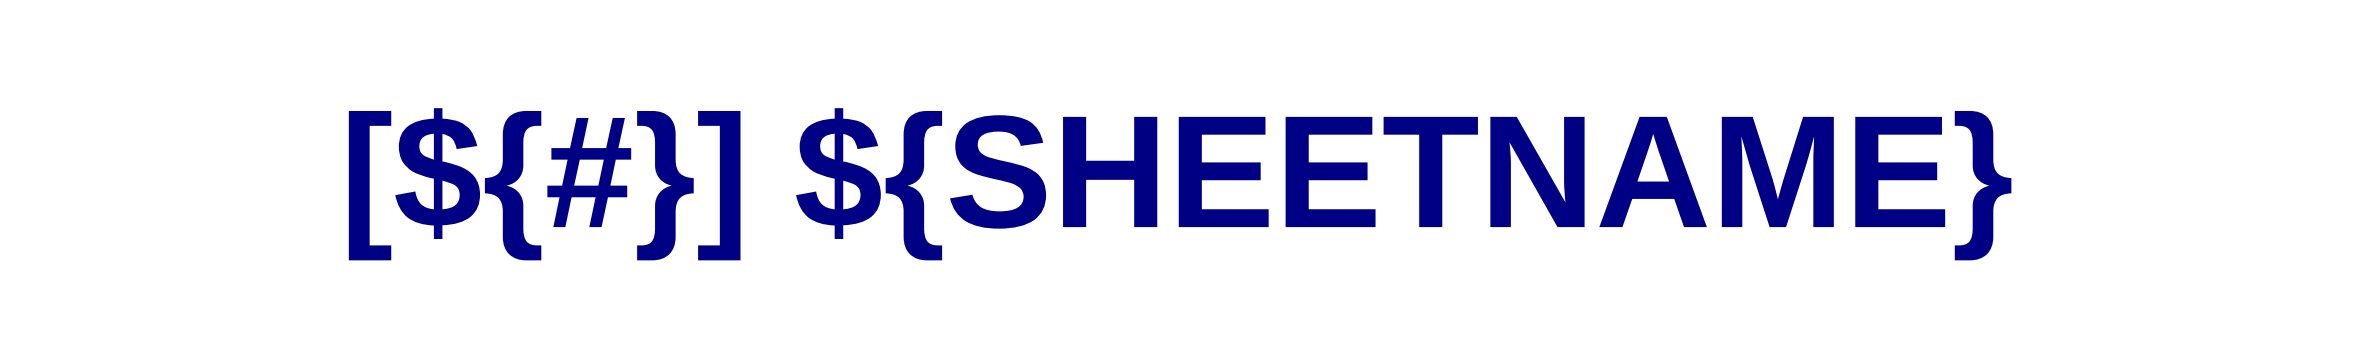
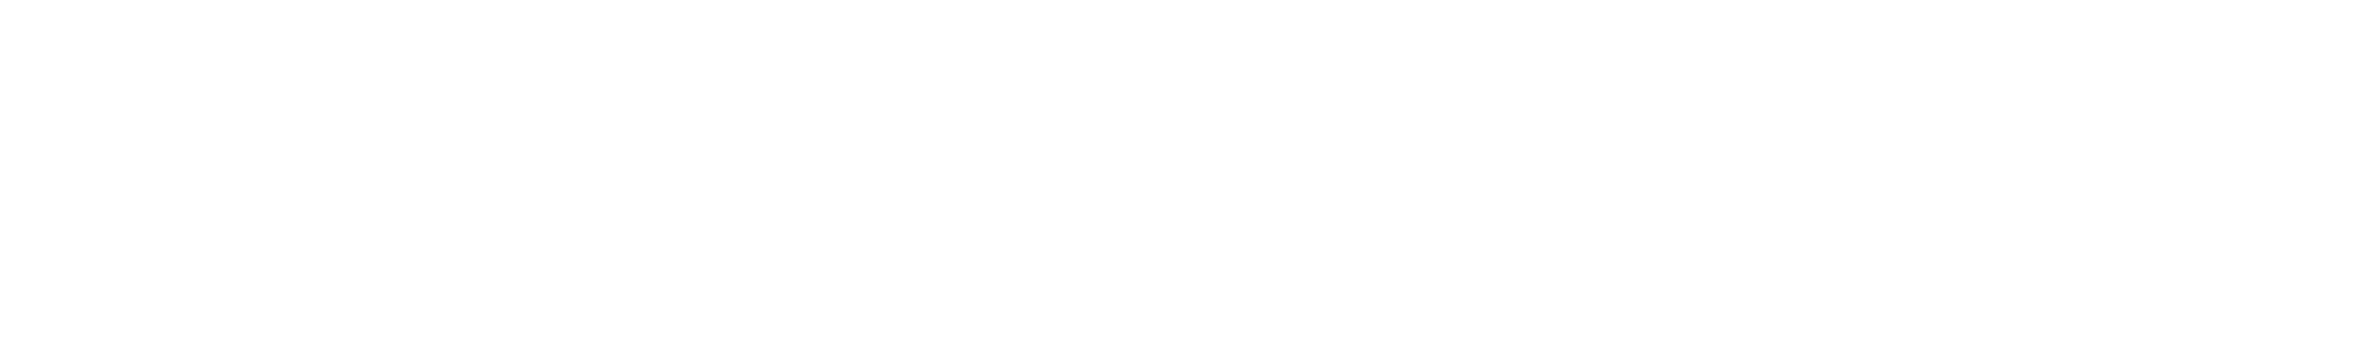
text: [${#}] ${SHEETNAME} (1180, 184) -> none

